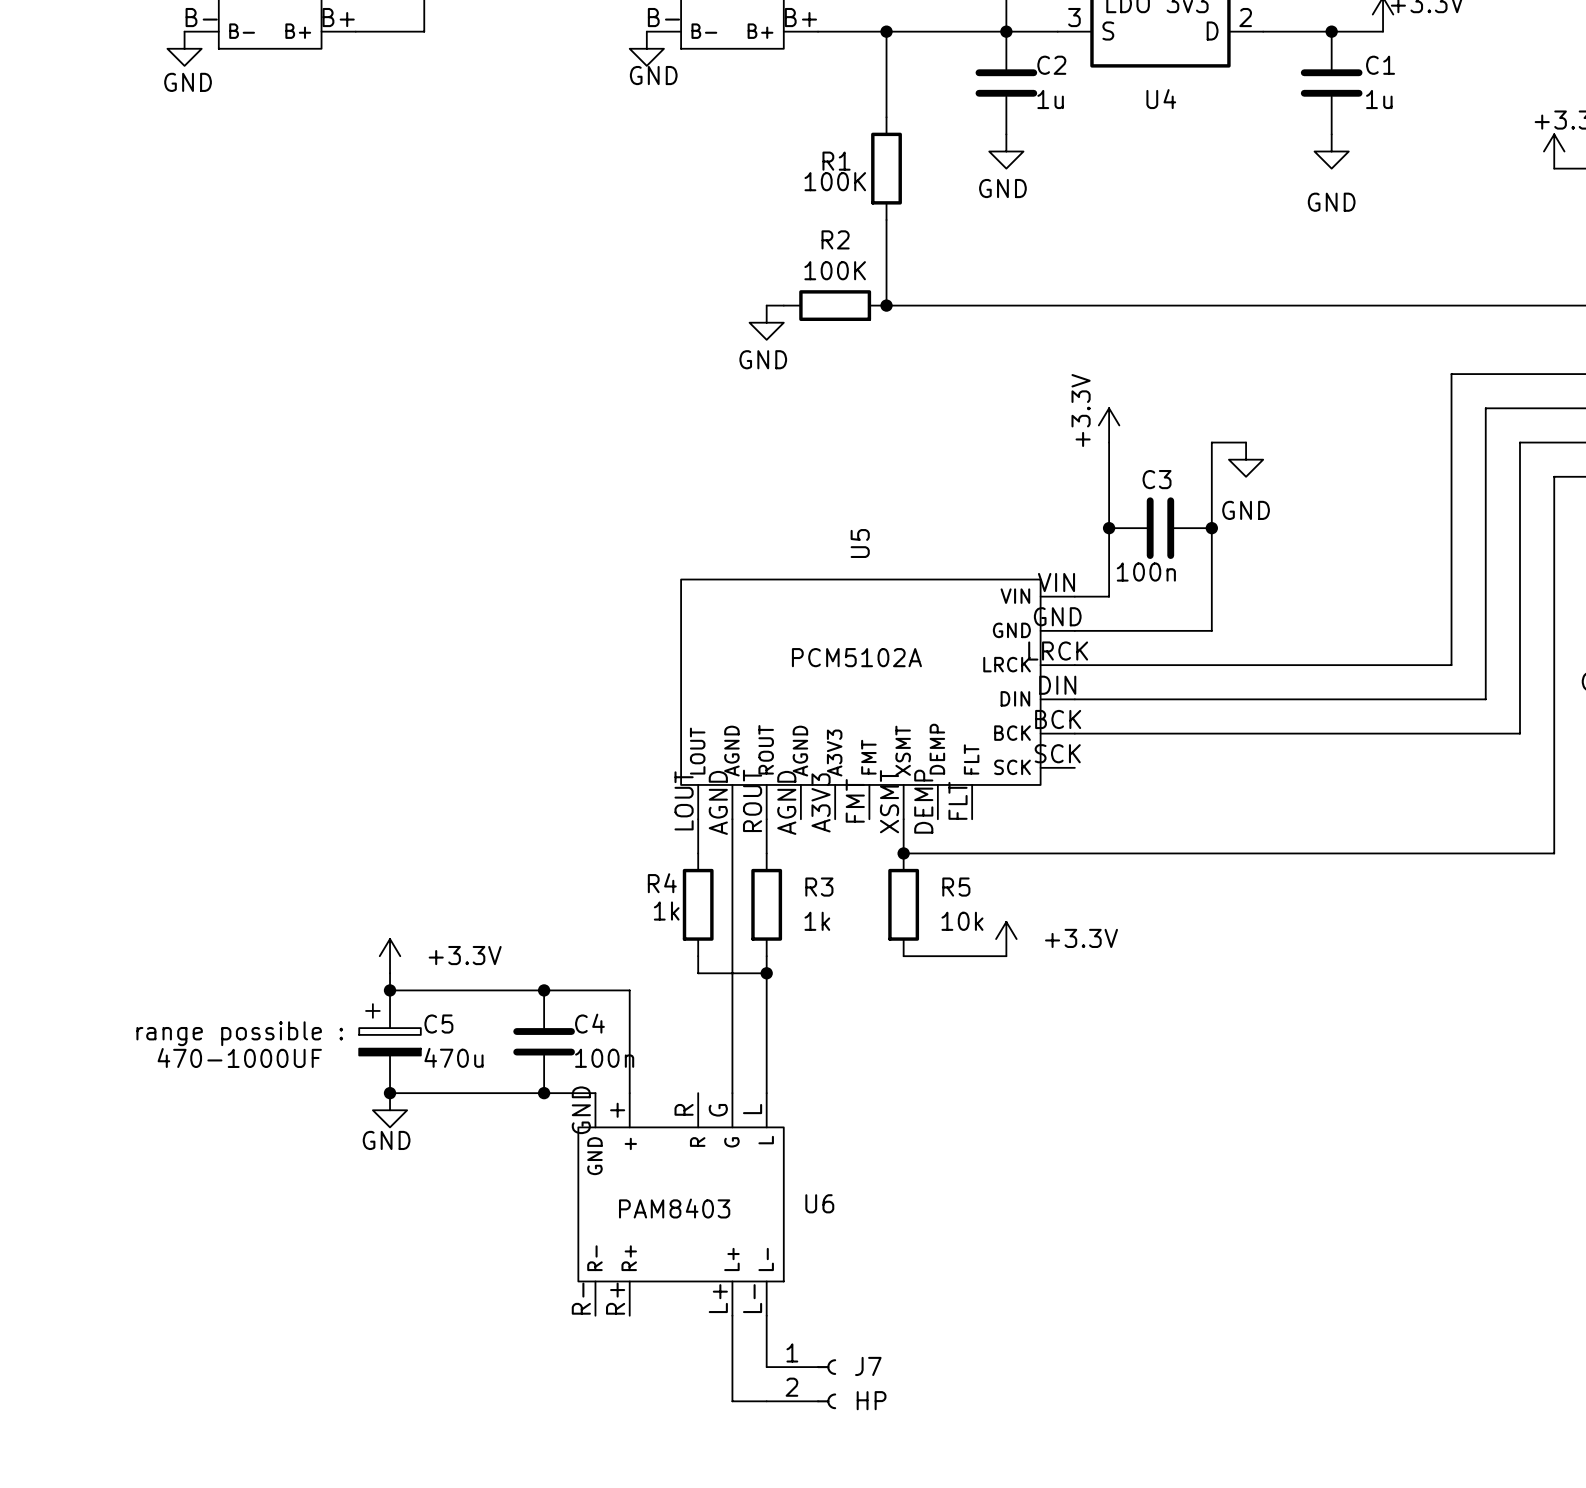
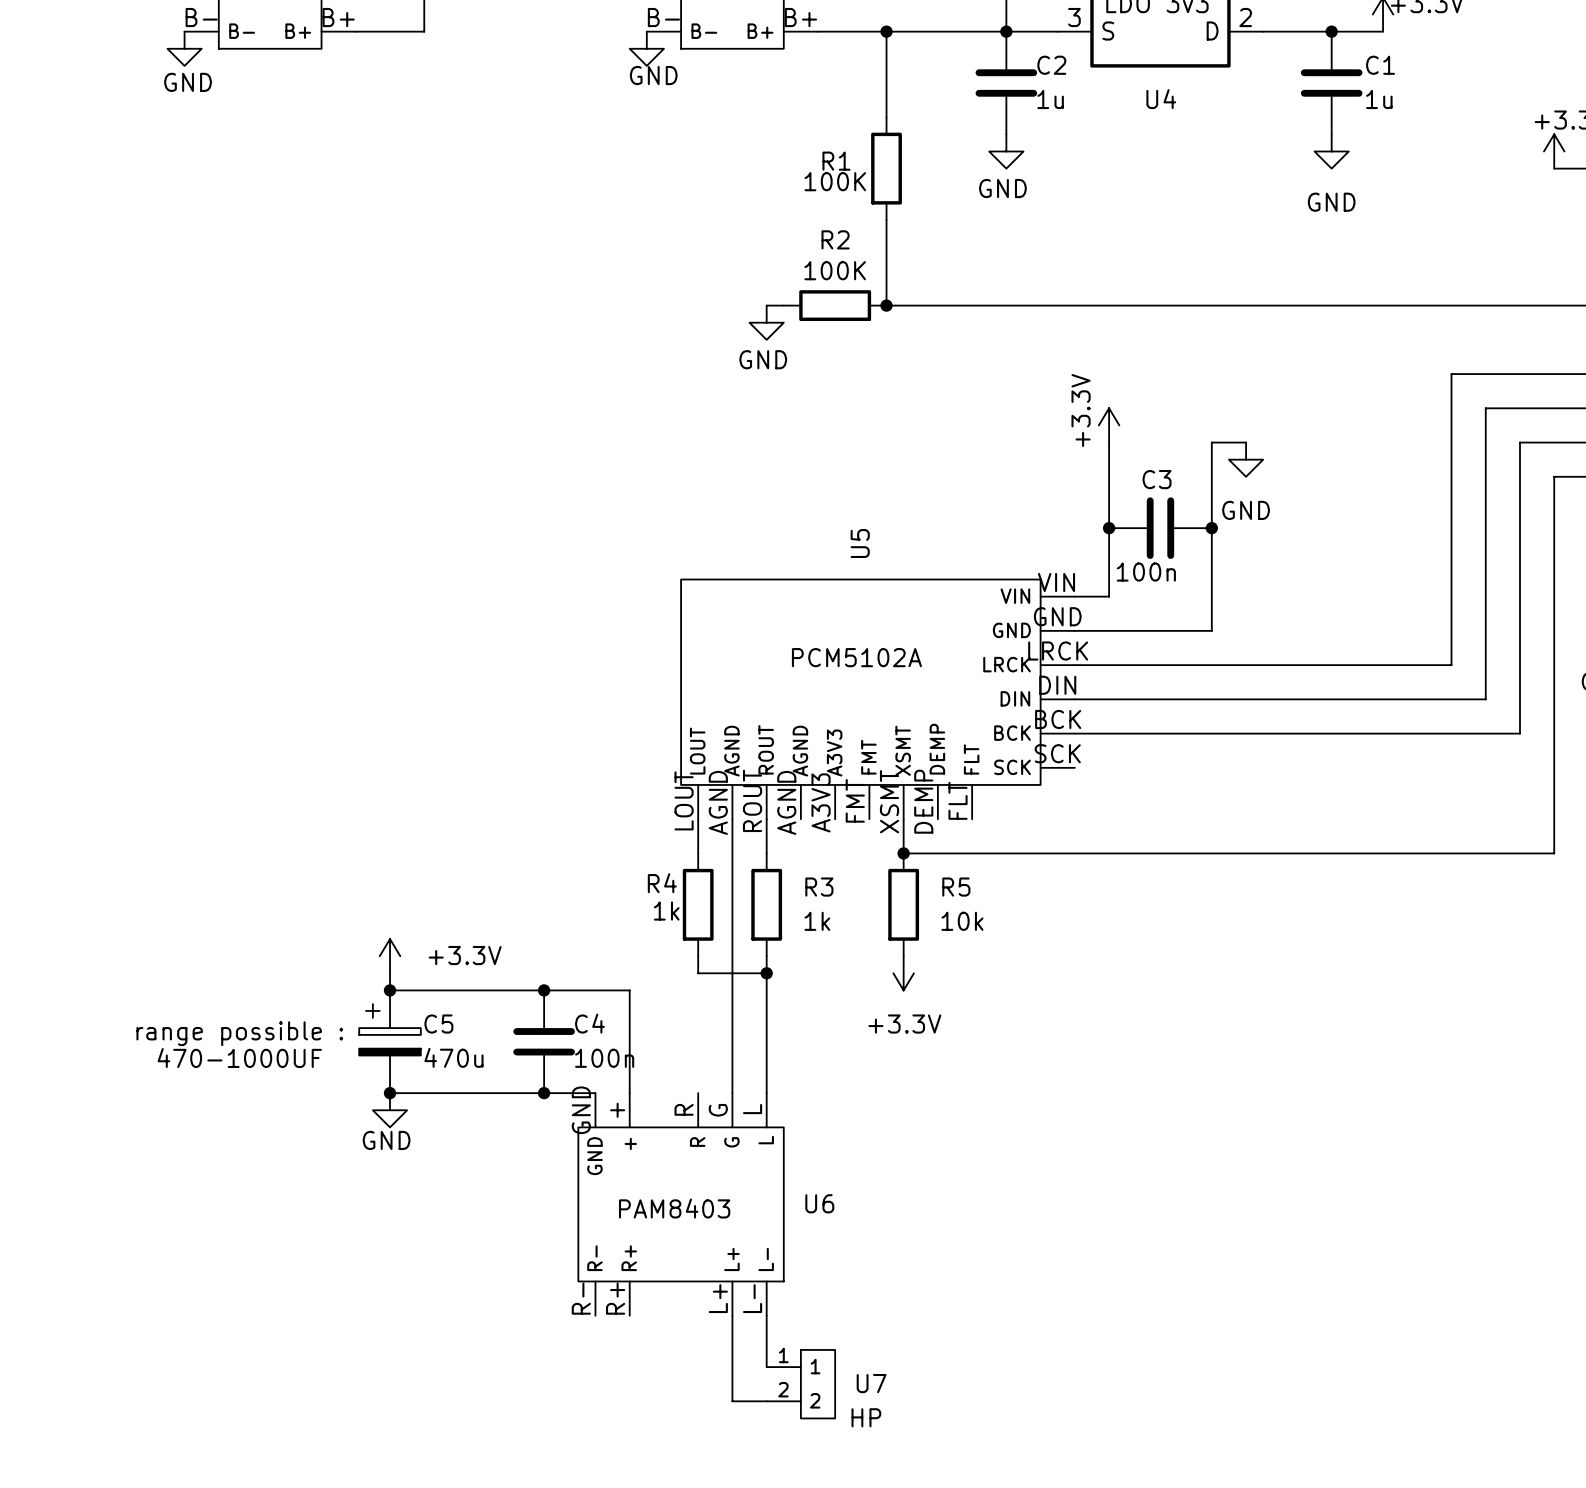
power symbol text position: +3.3V (1081, 938) -> +3.3V (904, 1024)
power symbol rotation: 0° (1006, 939) -> 180° (903, 973)
power symbol position: +3.3V (1006, 939) -> +3.3V (903, 973)
wire: (903, 956) (1006, 956) -> none
U7: none -> HP (800, 1384)
J7: HP (801, 1384) -> none

